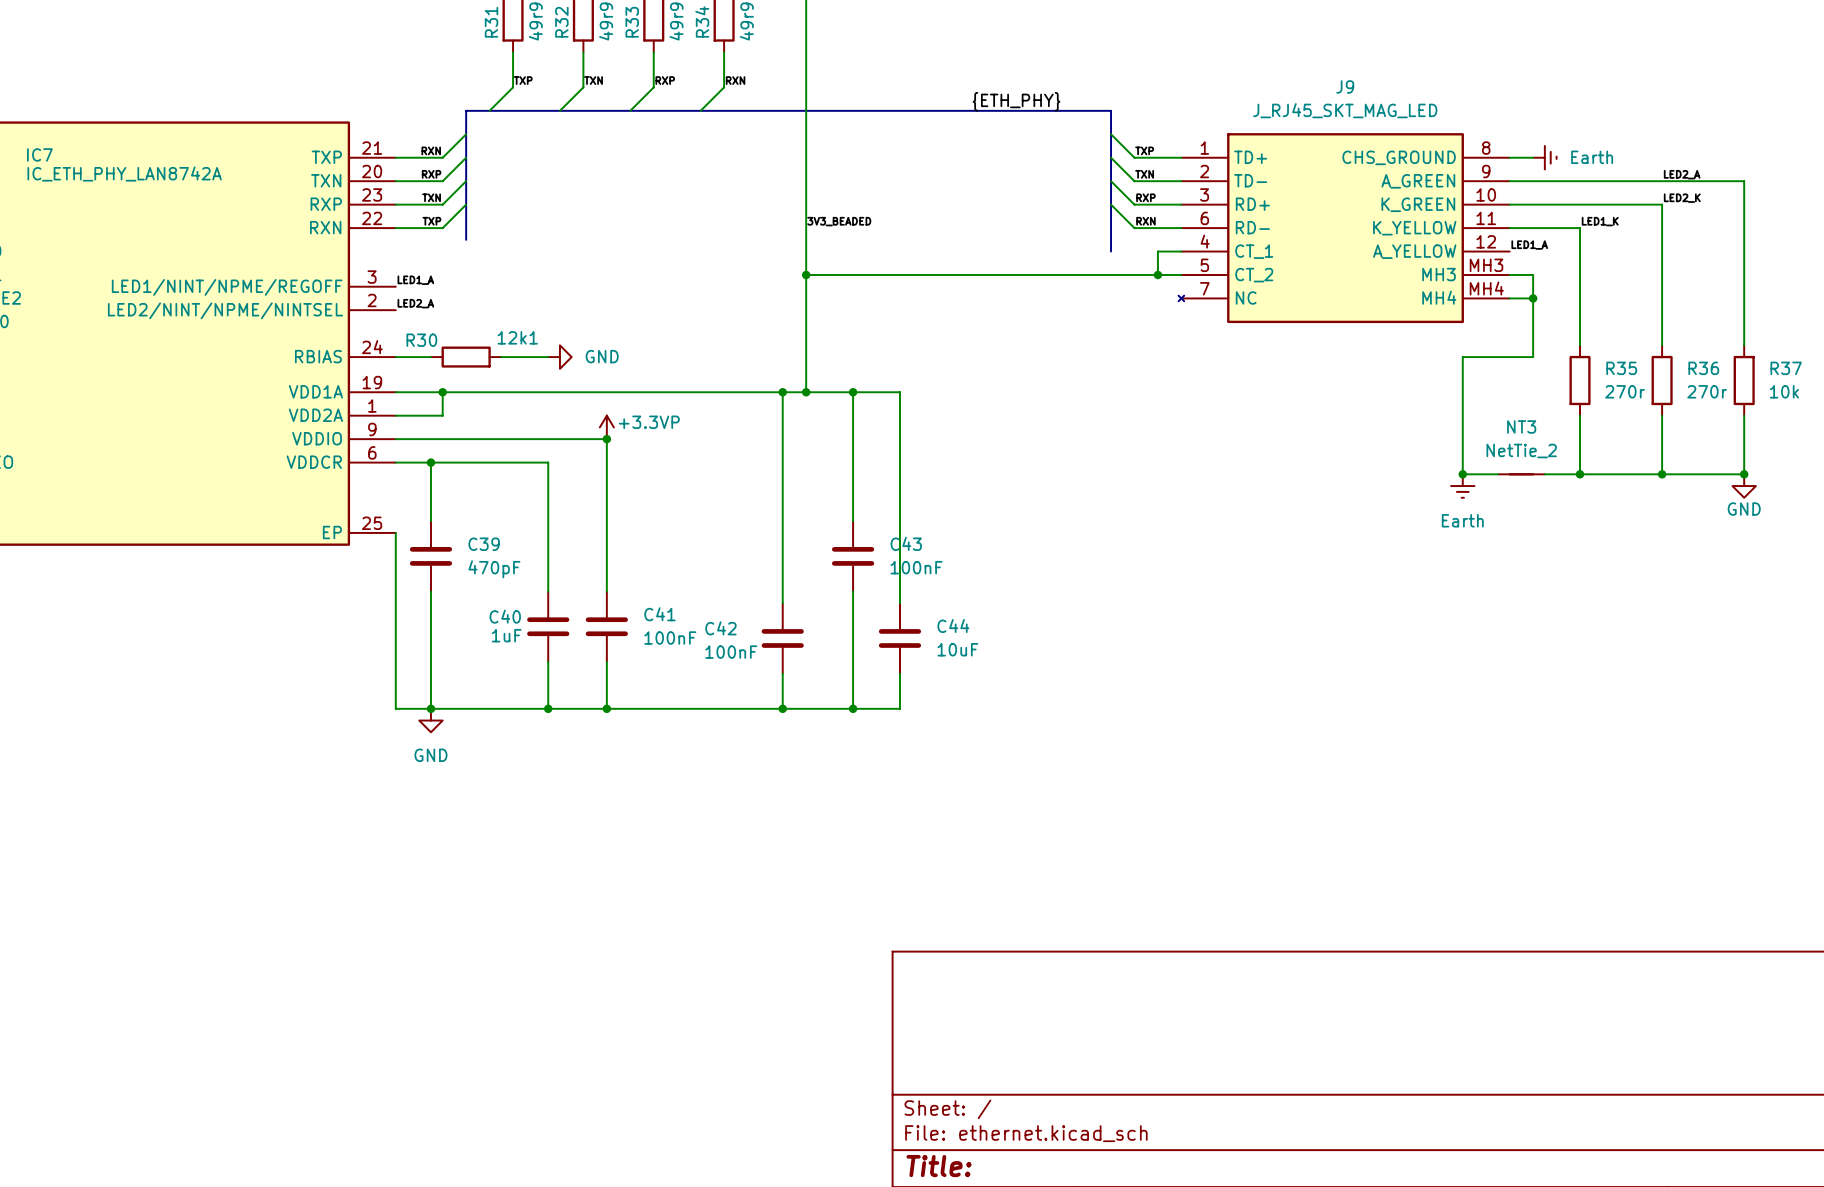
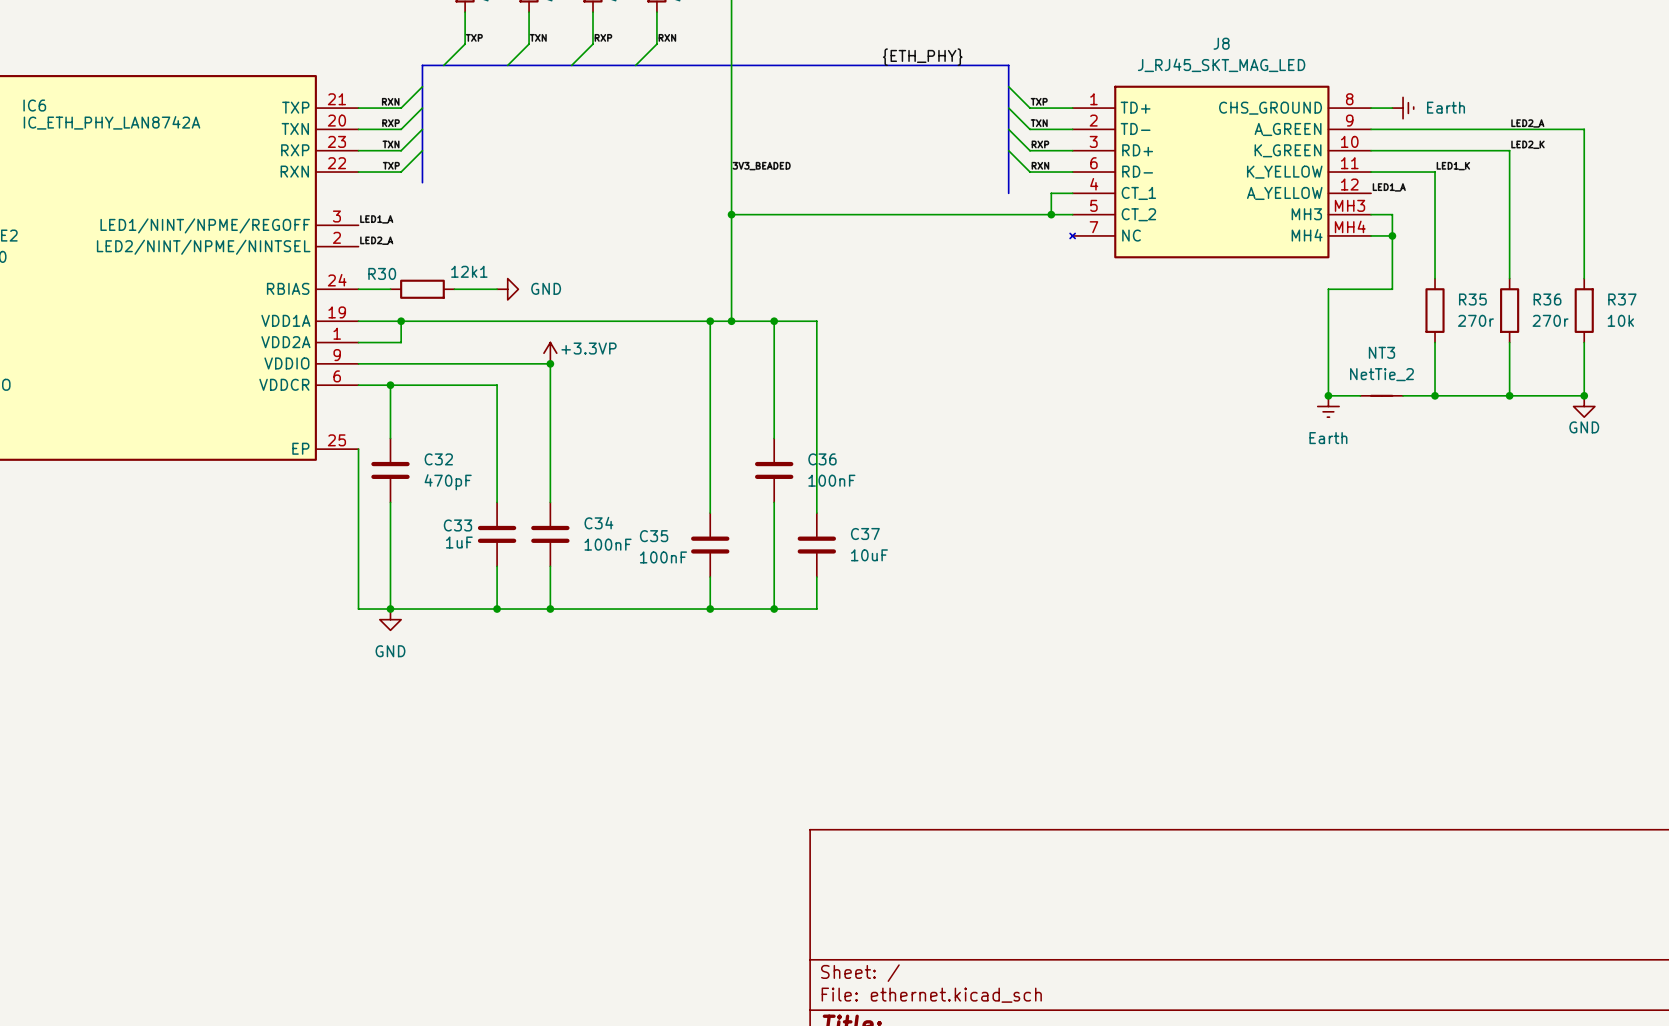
J9 name: J9 (1345, 86) -> J8 (1221, 43)
IC7 name: IC7 (39, 154) -> IC6 (34, 105)
C43 name: C43 (906, 543) -> C36 (822, 459)
C39 name: C39 (484, 544) -> C32 (438, 459)
C41 name: C41 (659, 614) -> C34 (598, 523)
C40 name: C40 (505, 616) -> C33 (457, 525)
C44 name: C44 (953, 626) -> C37 (865, 534)
C42 name: C42 (720, 628) -> C35 (654, 536)

